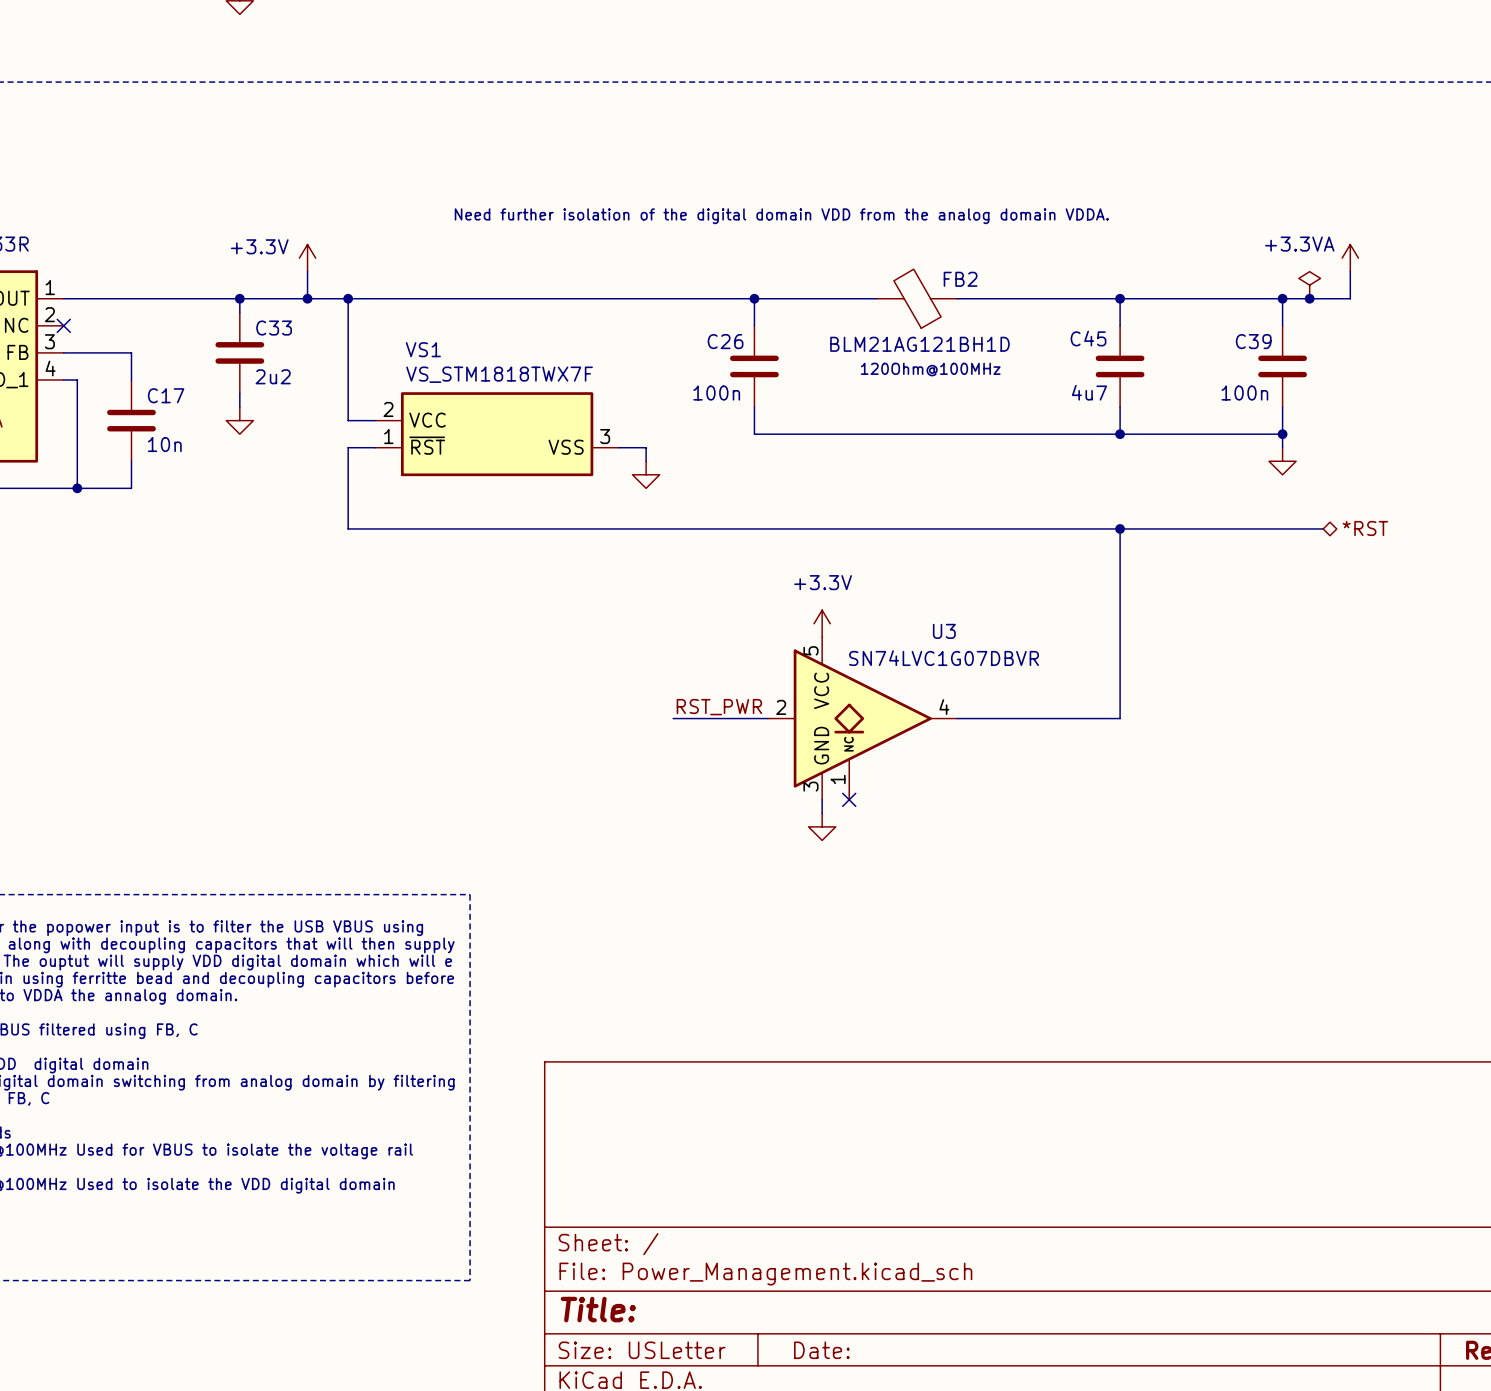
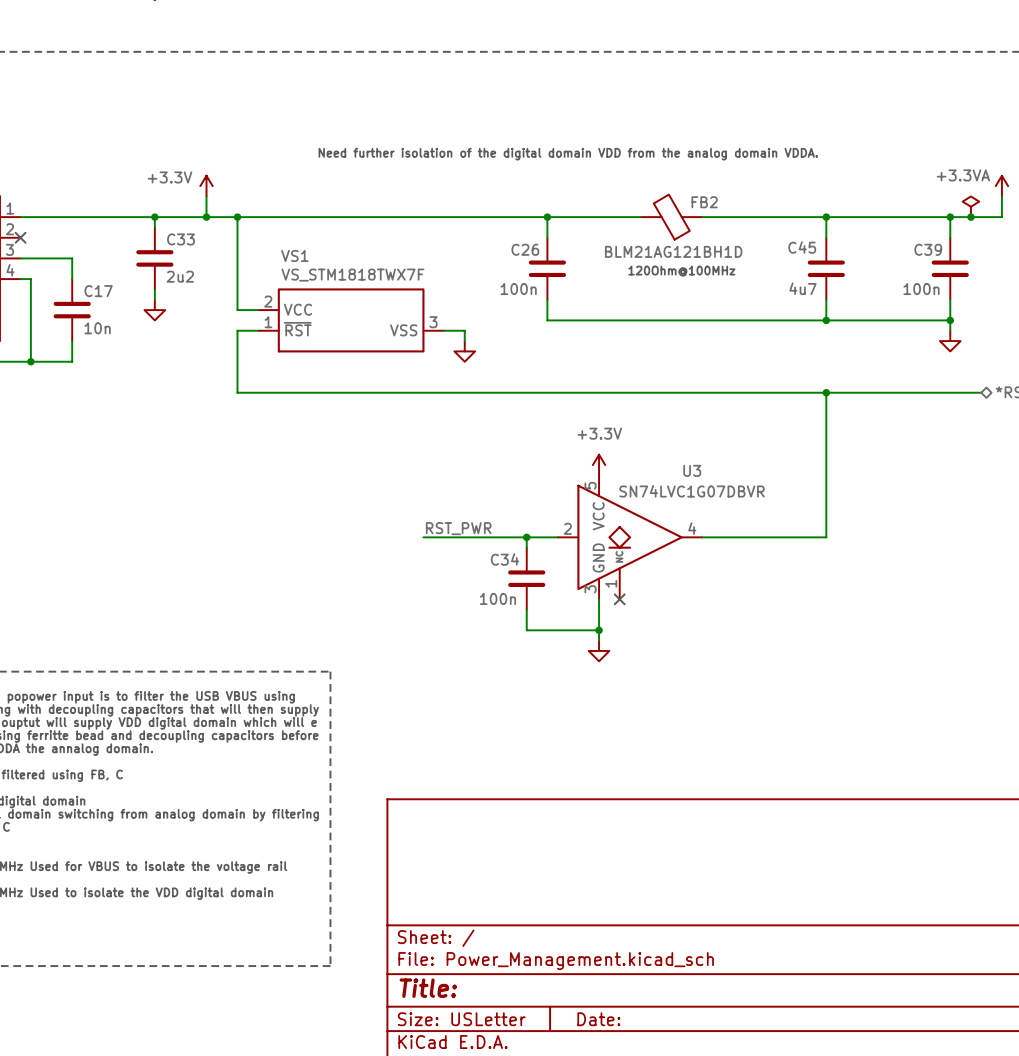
label position: RST_PWR (719, 707) -> RST_PWR (458, 528)
wire: none -> (423, 537) (485, 537)
wire: none -> (526, 537) (526, 547)
junction: none -> (526, 537)
C34: none -> 100n (526, 578)
wire: none -> (526, 609) (526, 630) (599, 630)
wire: none -> (599, 609) (599, 640)
power symbol position: (822, 826) -> (599, 650)
junction: none -> (599, 630)

